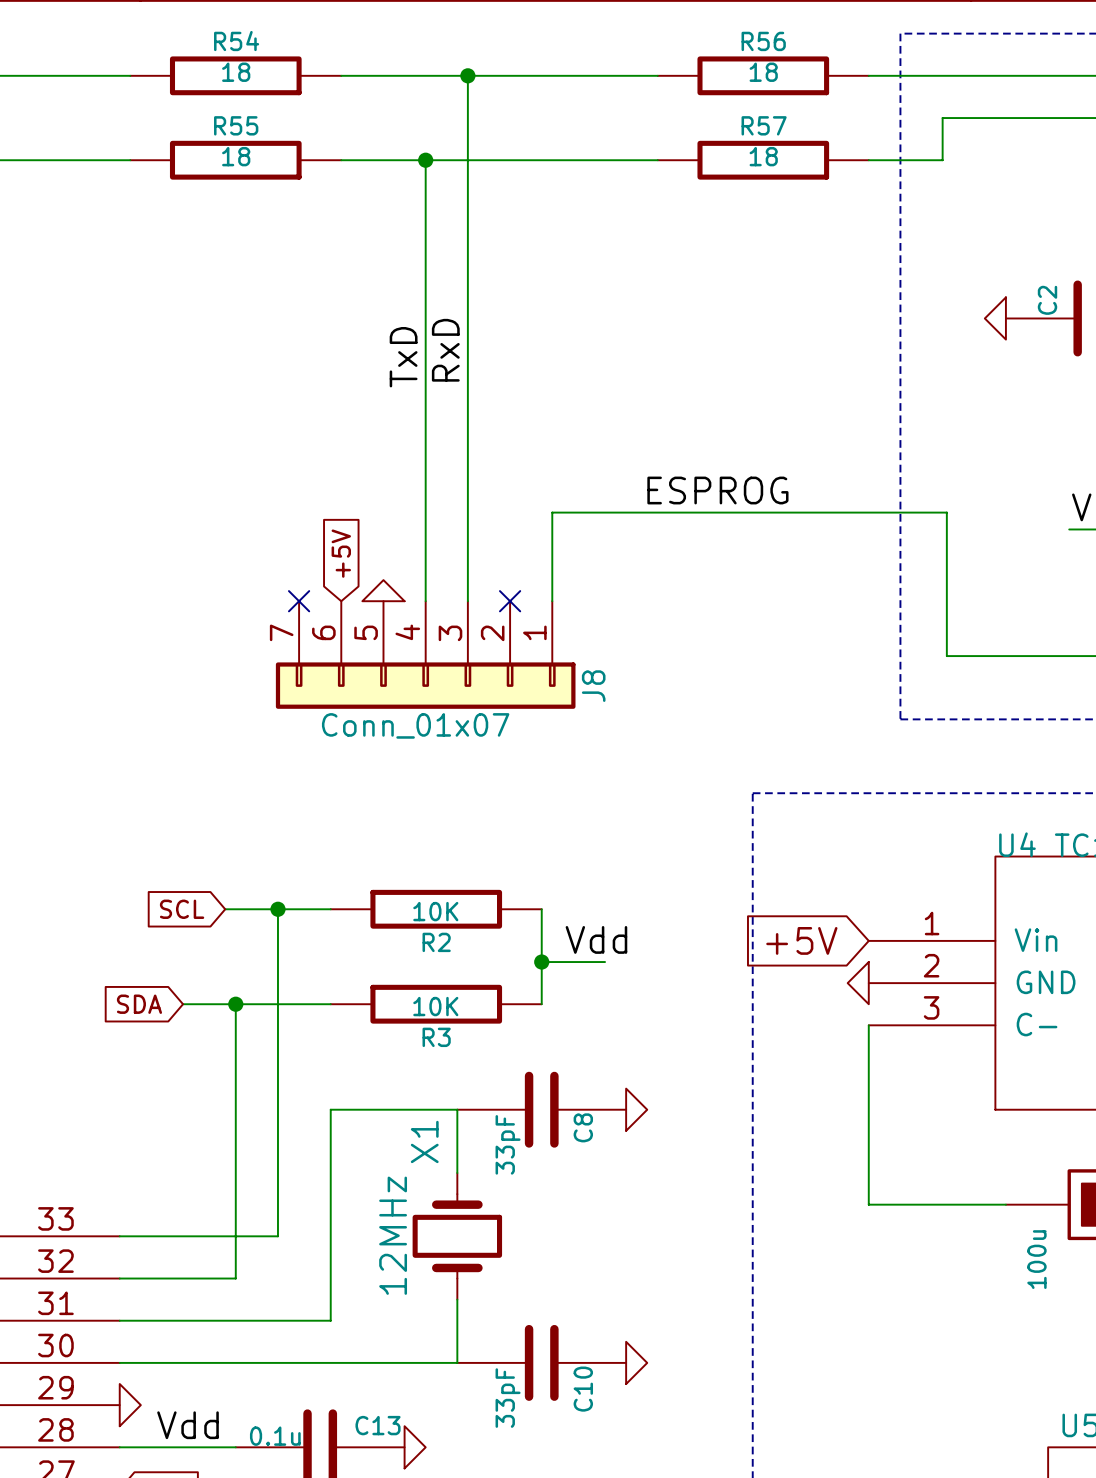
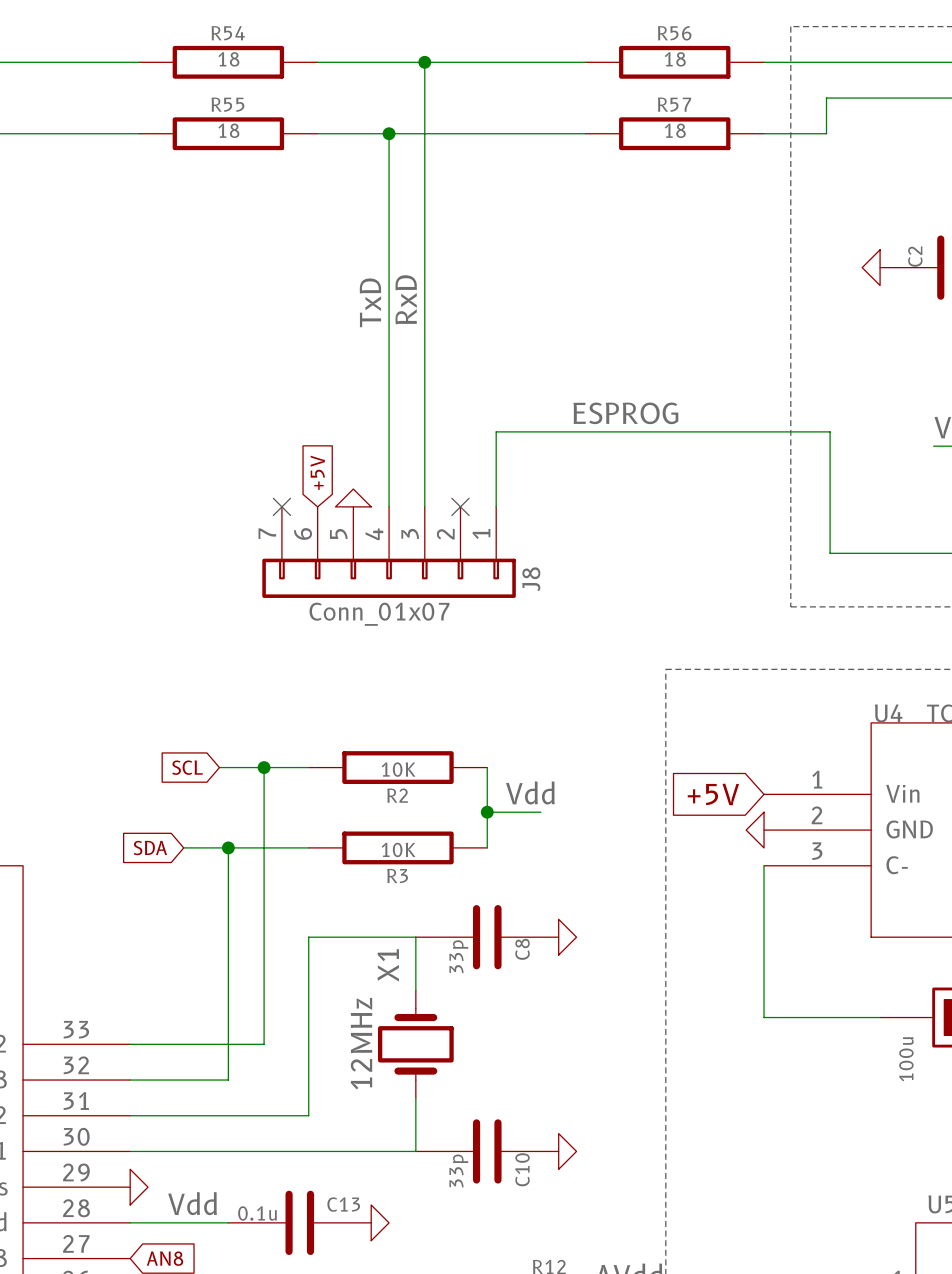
C8 value: 33pF (508, 1144) -> 33p (458, 956)
C10 value: 33pF (508, 1398) -> 33p (458, 1170)

